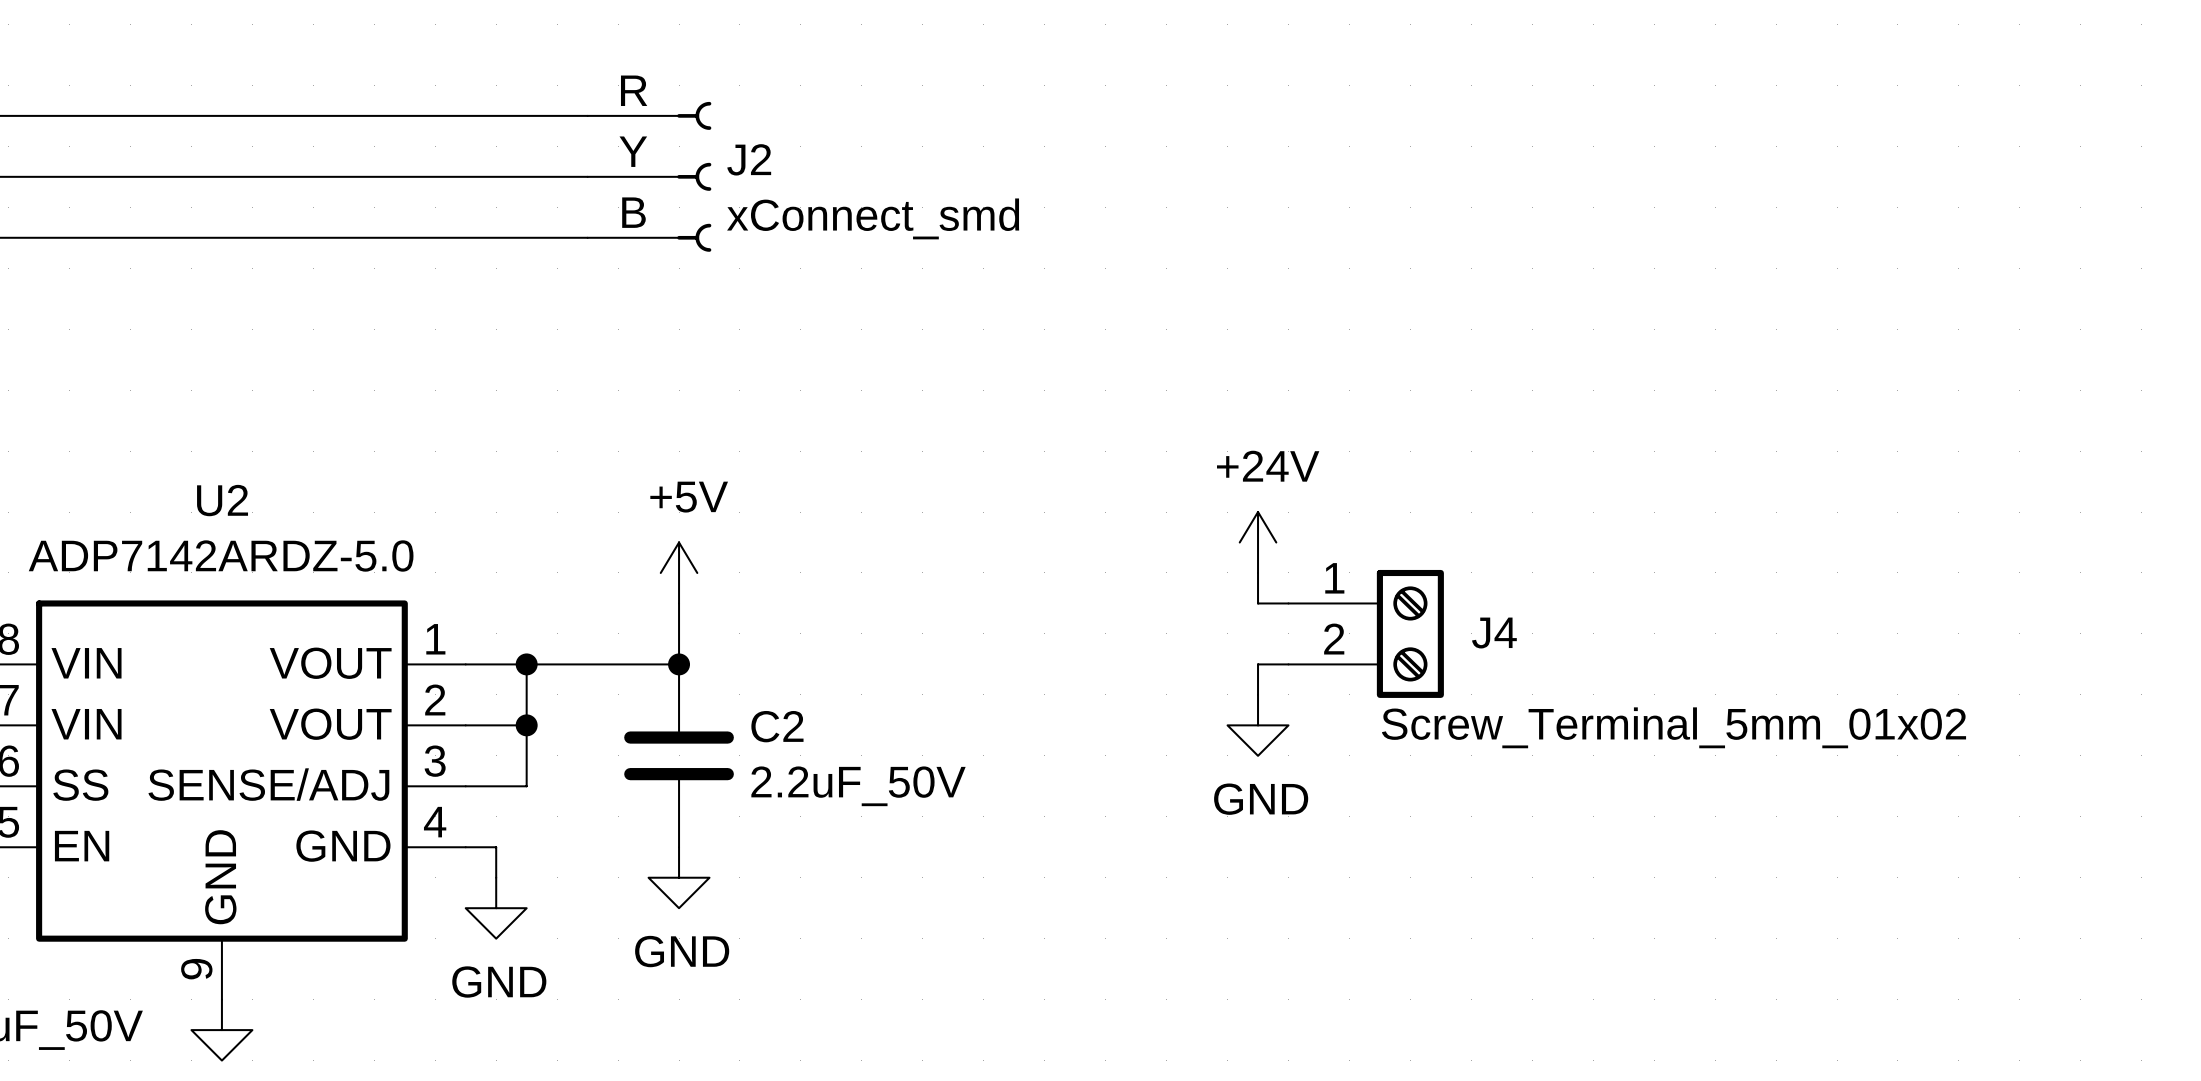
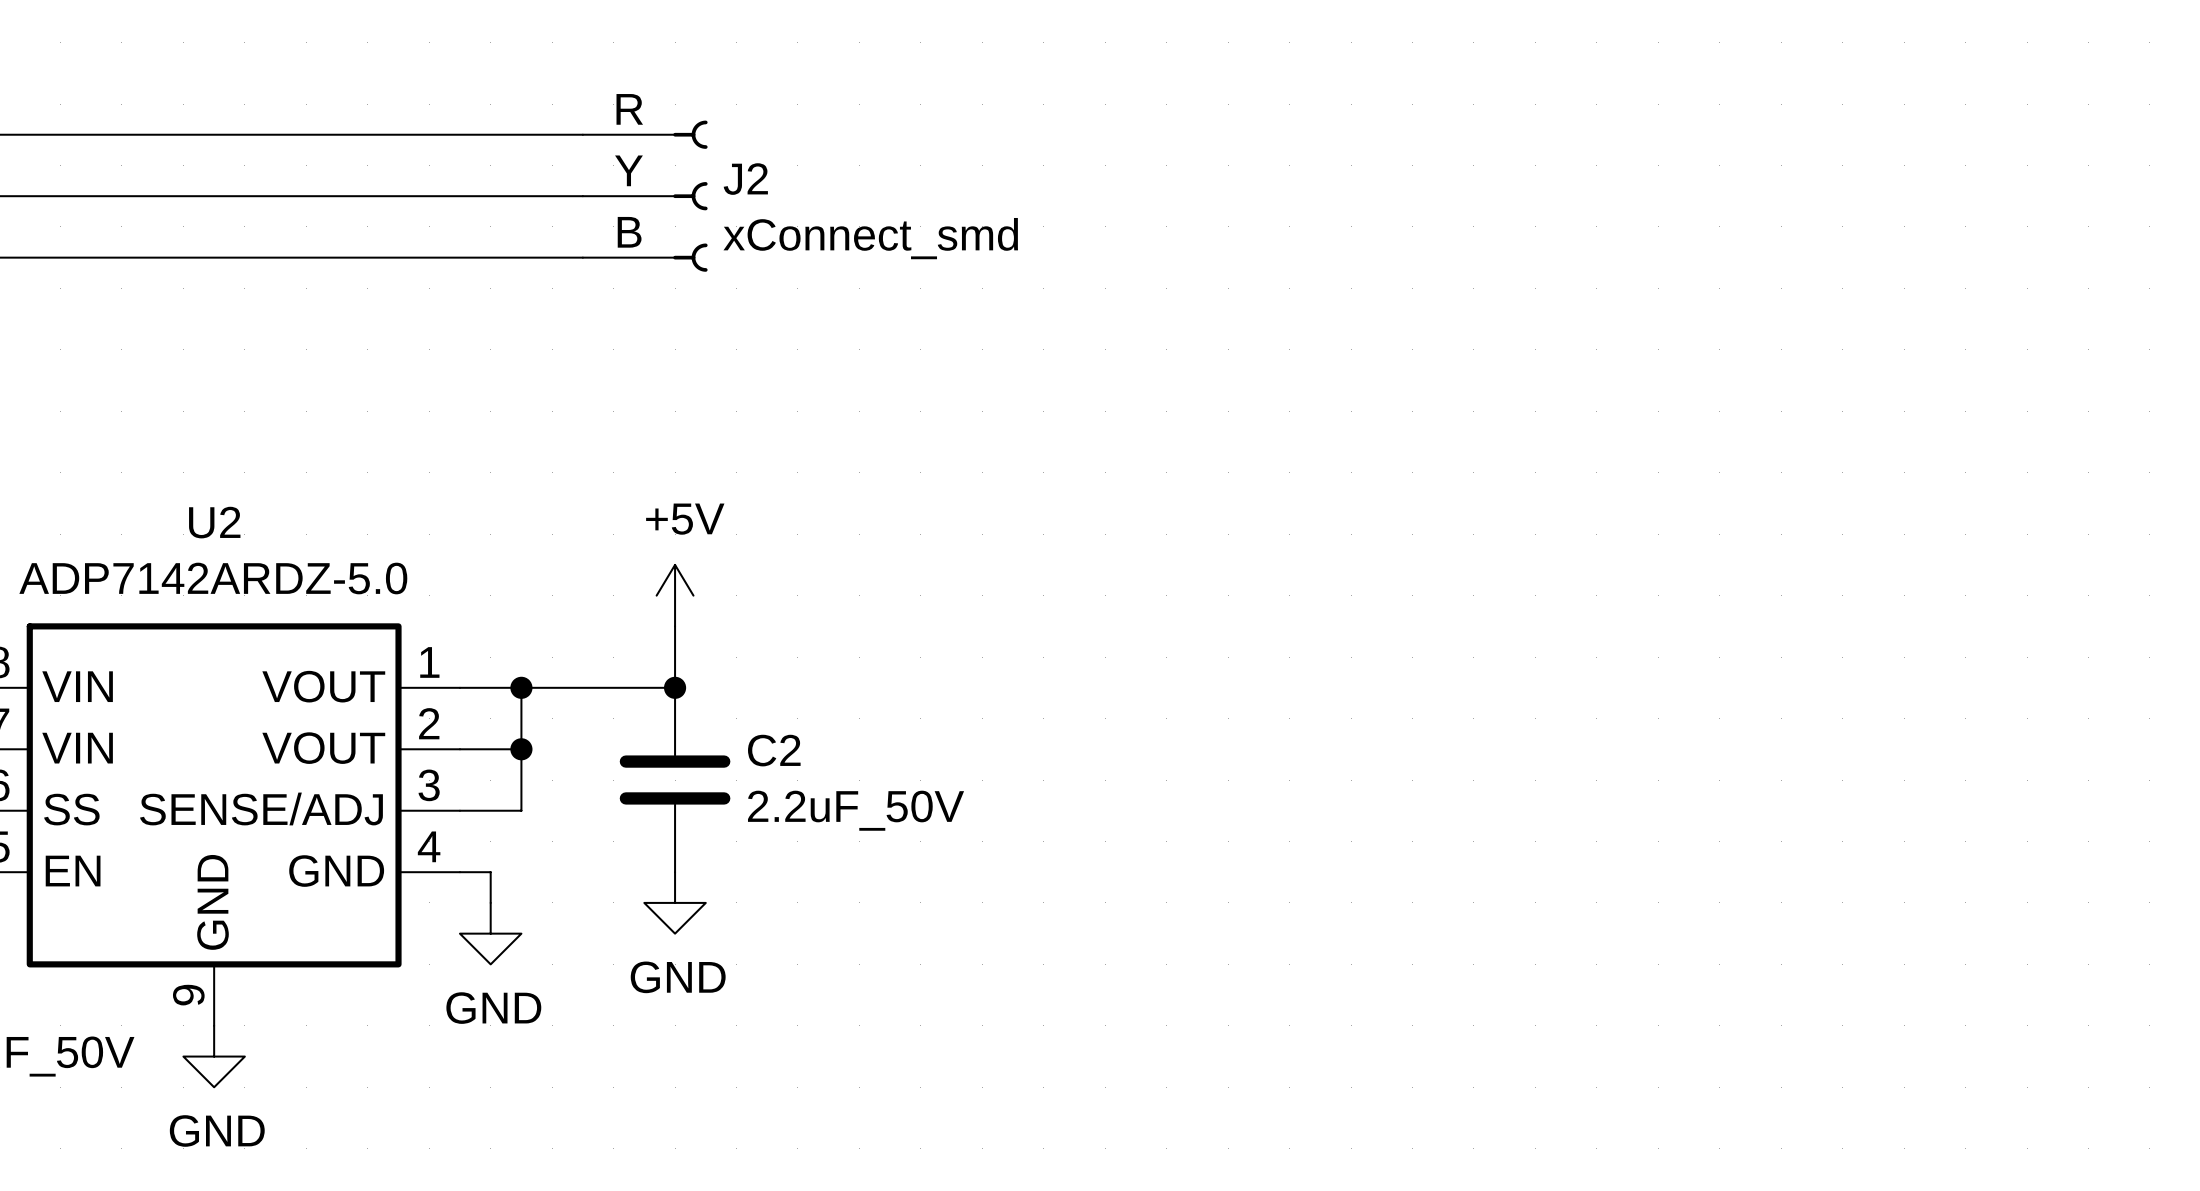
power symbol: +24V (1258, 542) -> none
wire: (1258, 572) (1258, 603) (1288, 603) -> none
J4: Screw_Terminal_5mm_01x02 (1366, 633) -> none
wire: (1288, 664) (1258, 664) (1258, 694) -> none
power symbol: GND (1258, 725) -> none

